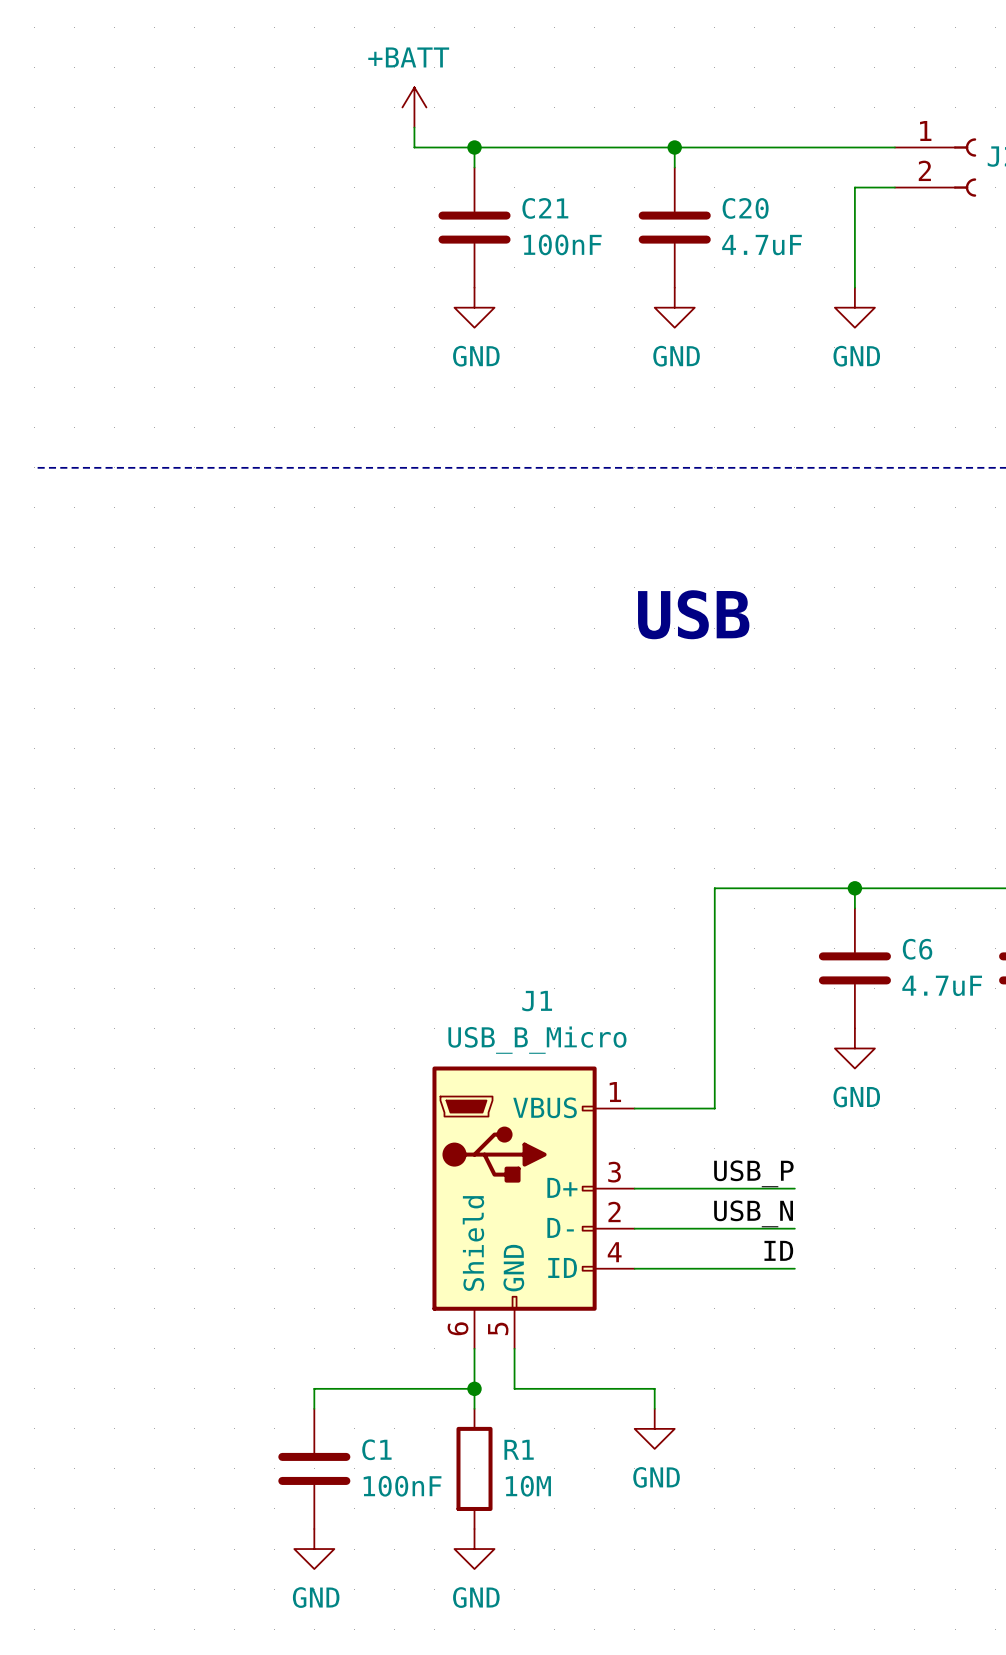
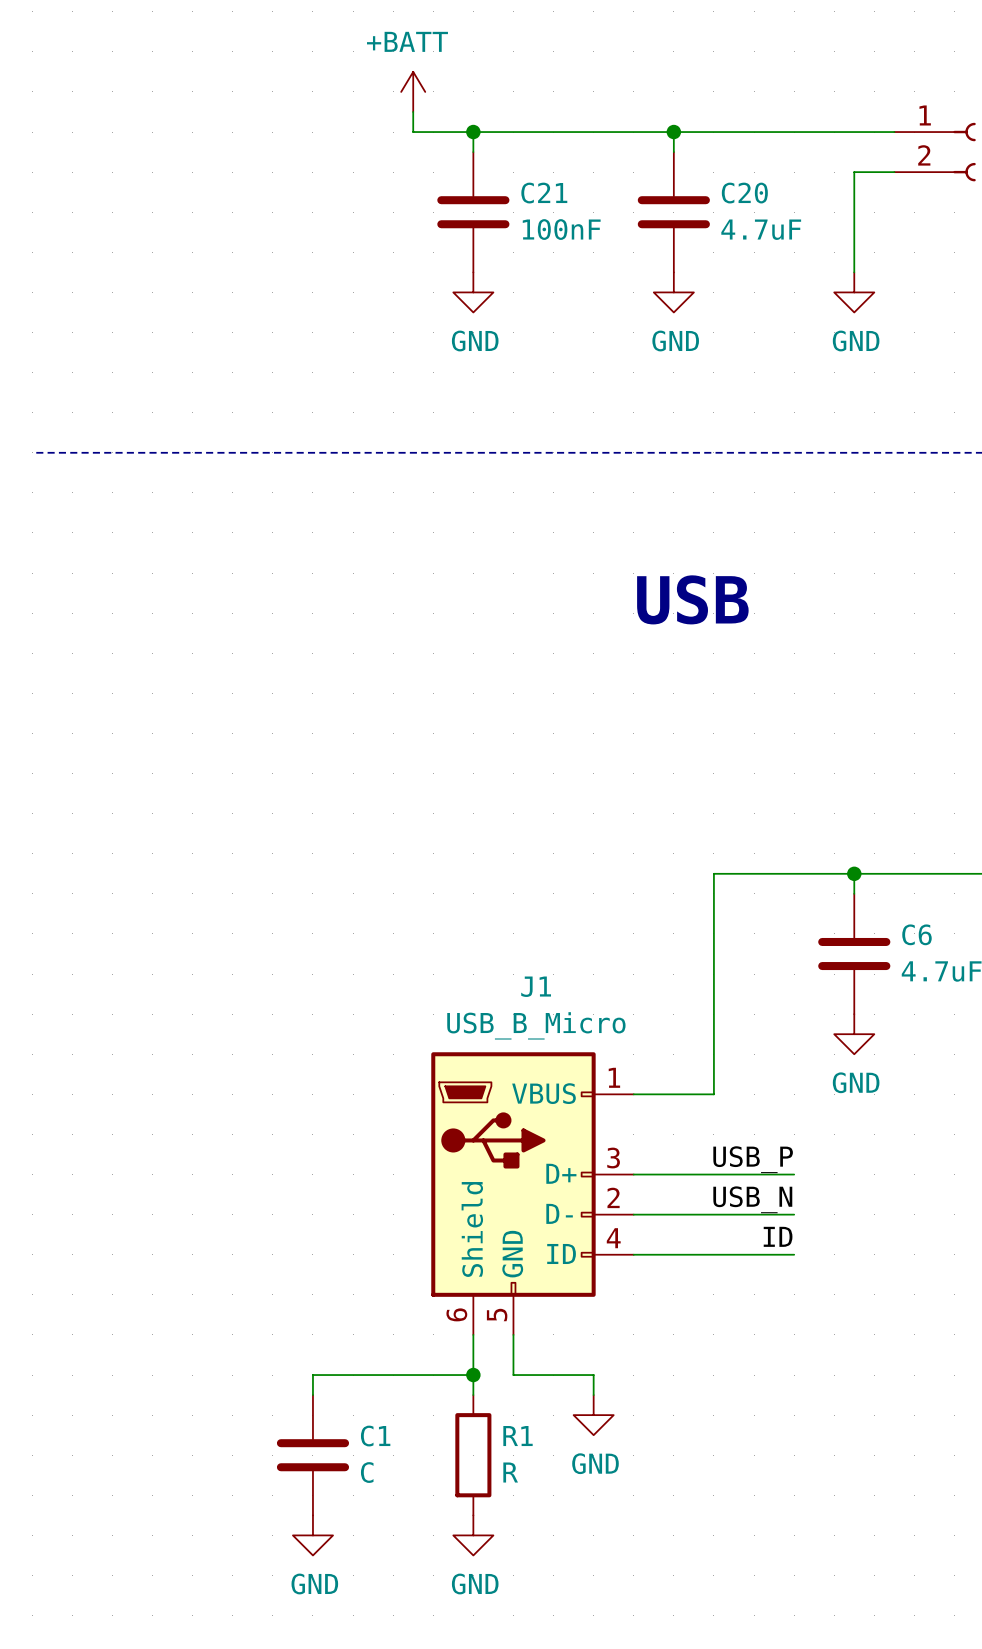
wire: (594, 1388) (654, 1388) (654, 1408) -> (593, 1375) (593, 1395)
power symbol position: GND (654, 1428) -> GND (593, 1415)
C1 value: 100nF (402, 1486) -> C (367, 1472)
R1 value: 10M (528, 1486) -> R (510, 1472)

